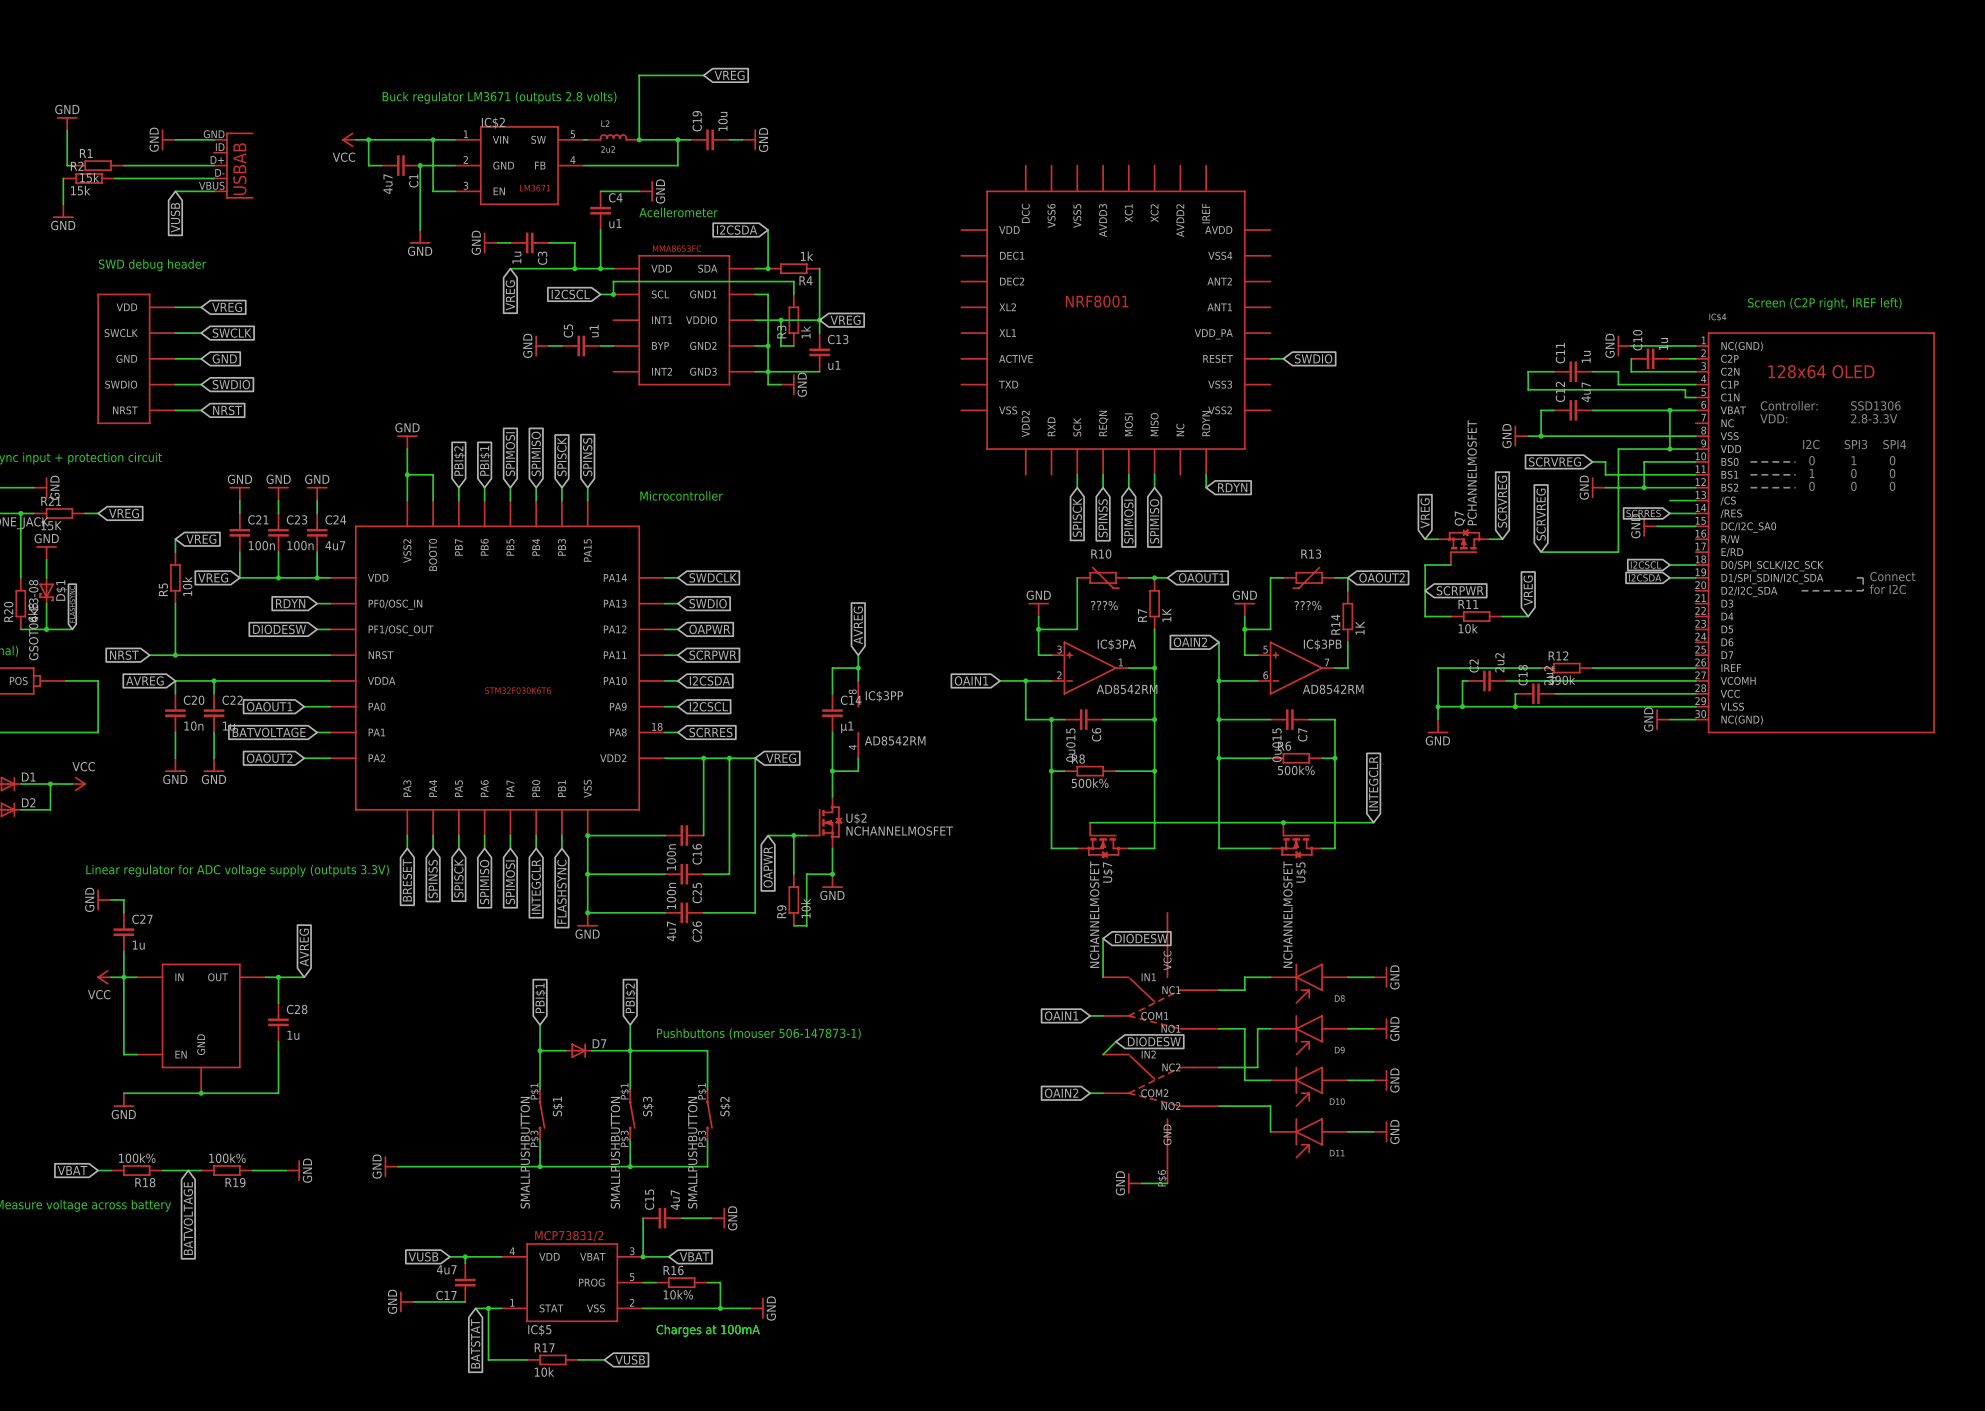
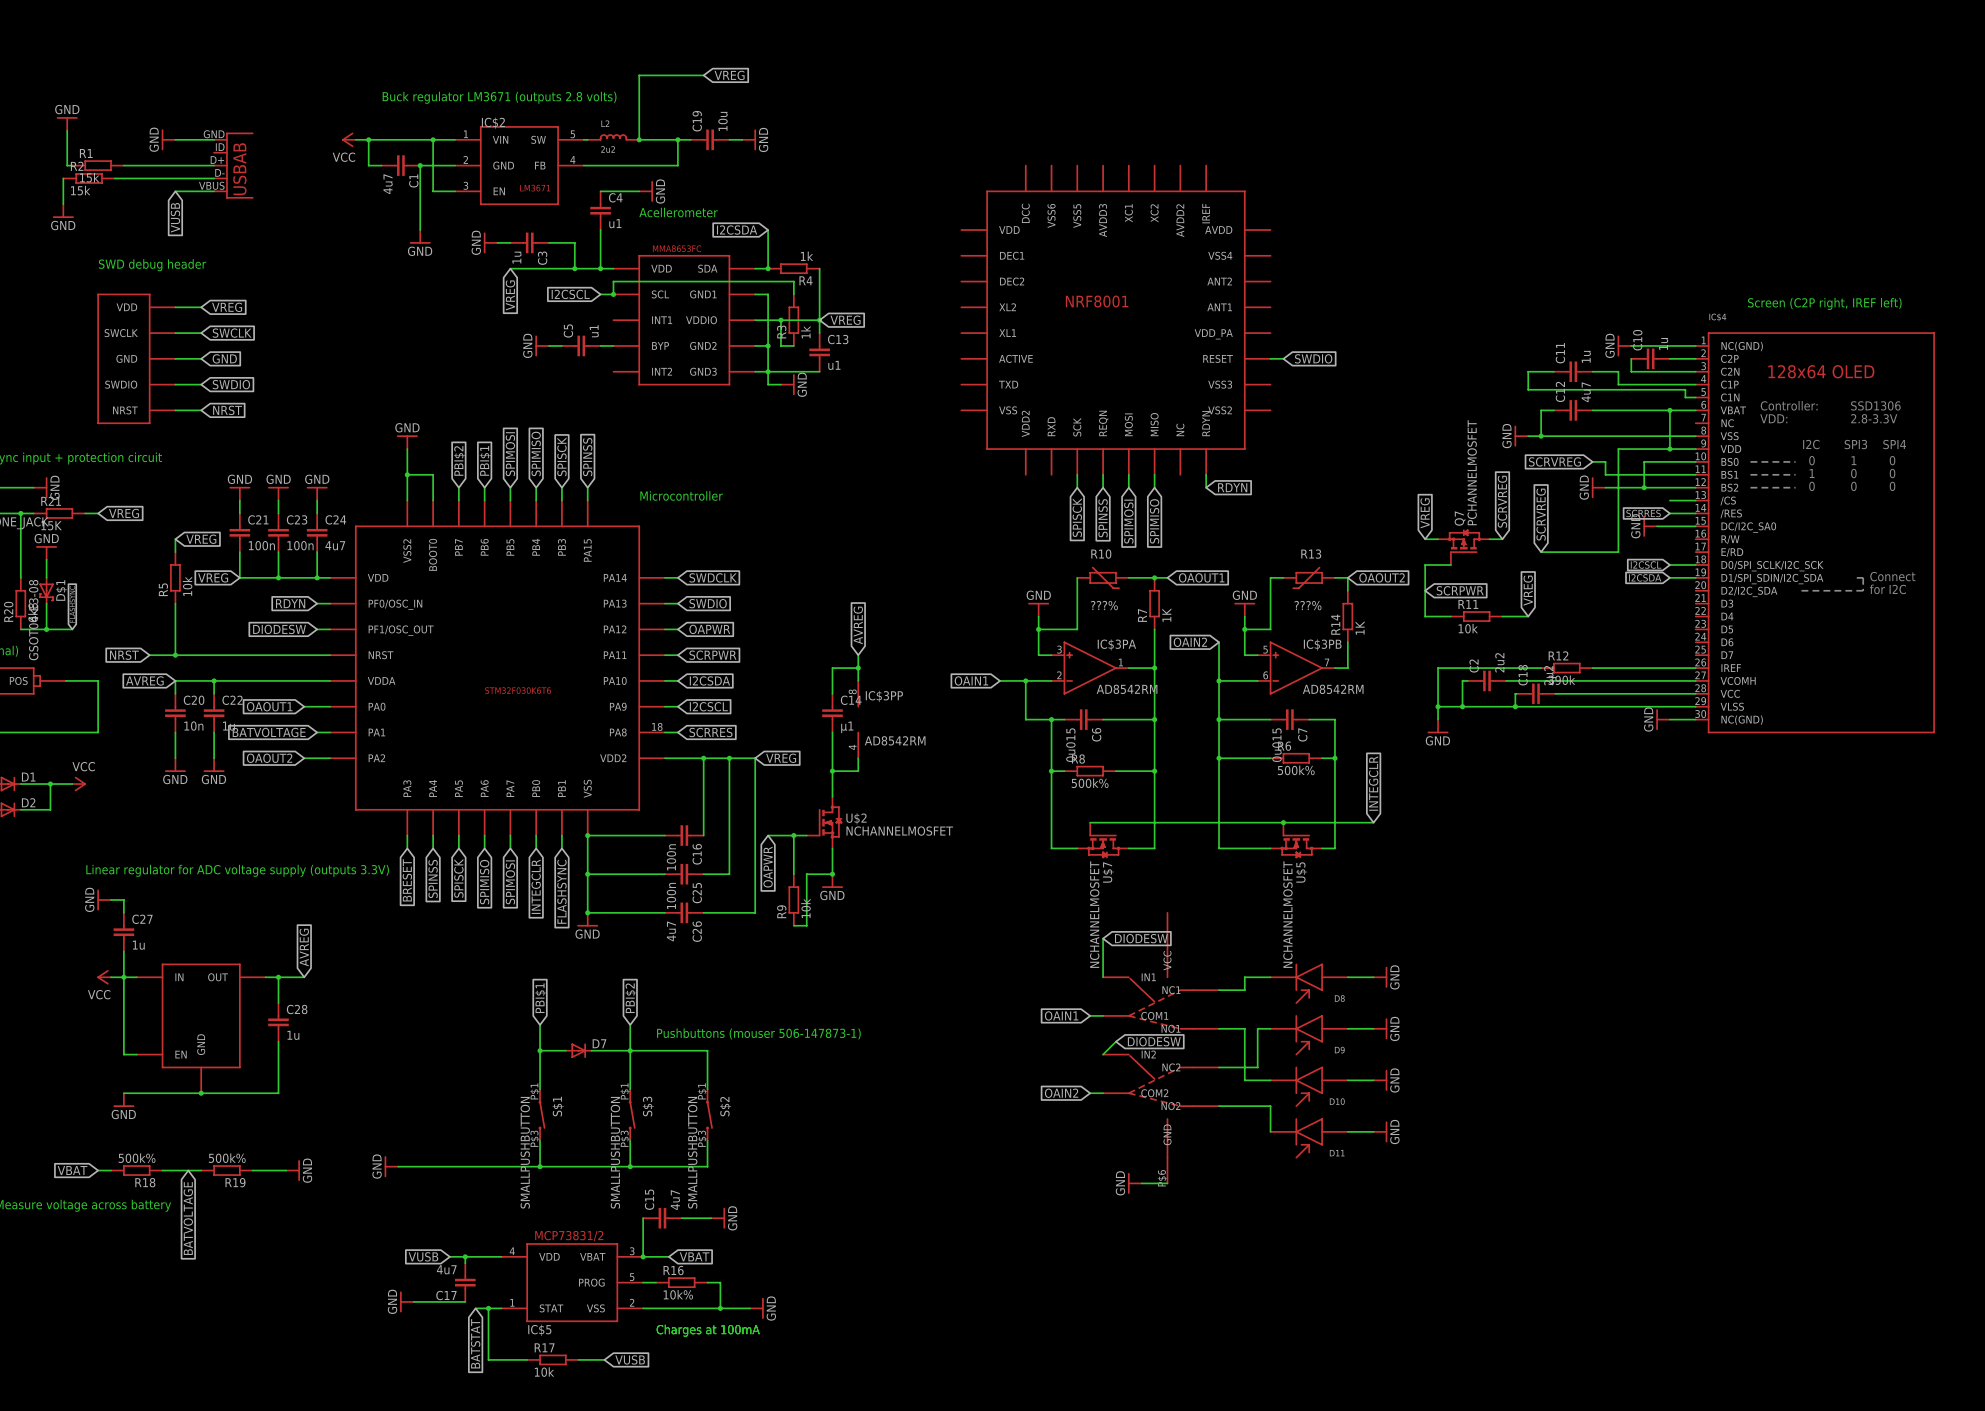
R18 value: 100k% (137, 1158) -> 500k% (137, 1158)
R19 value: 100k% (227, 1158) -> 500k% (227, 1158)

